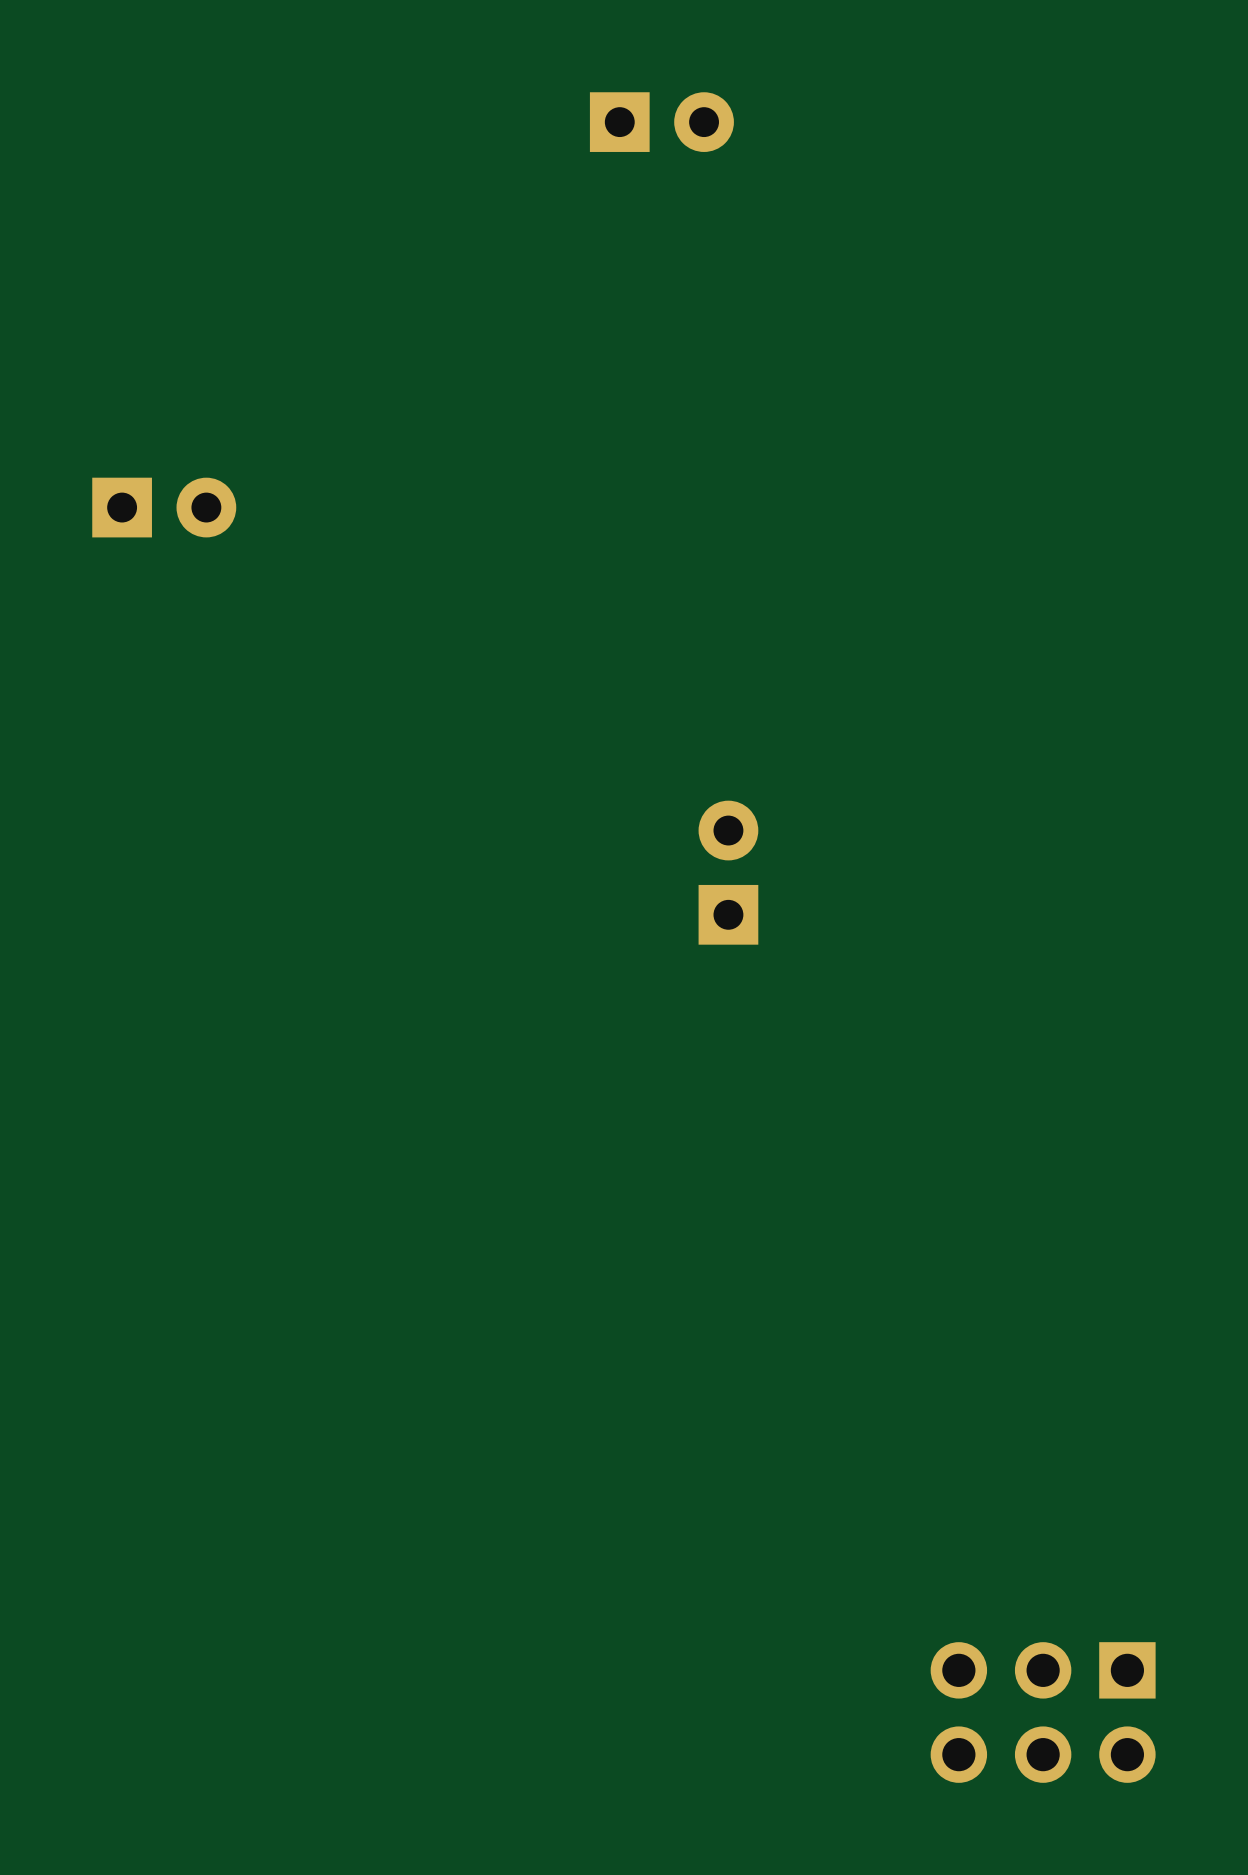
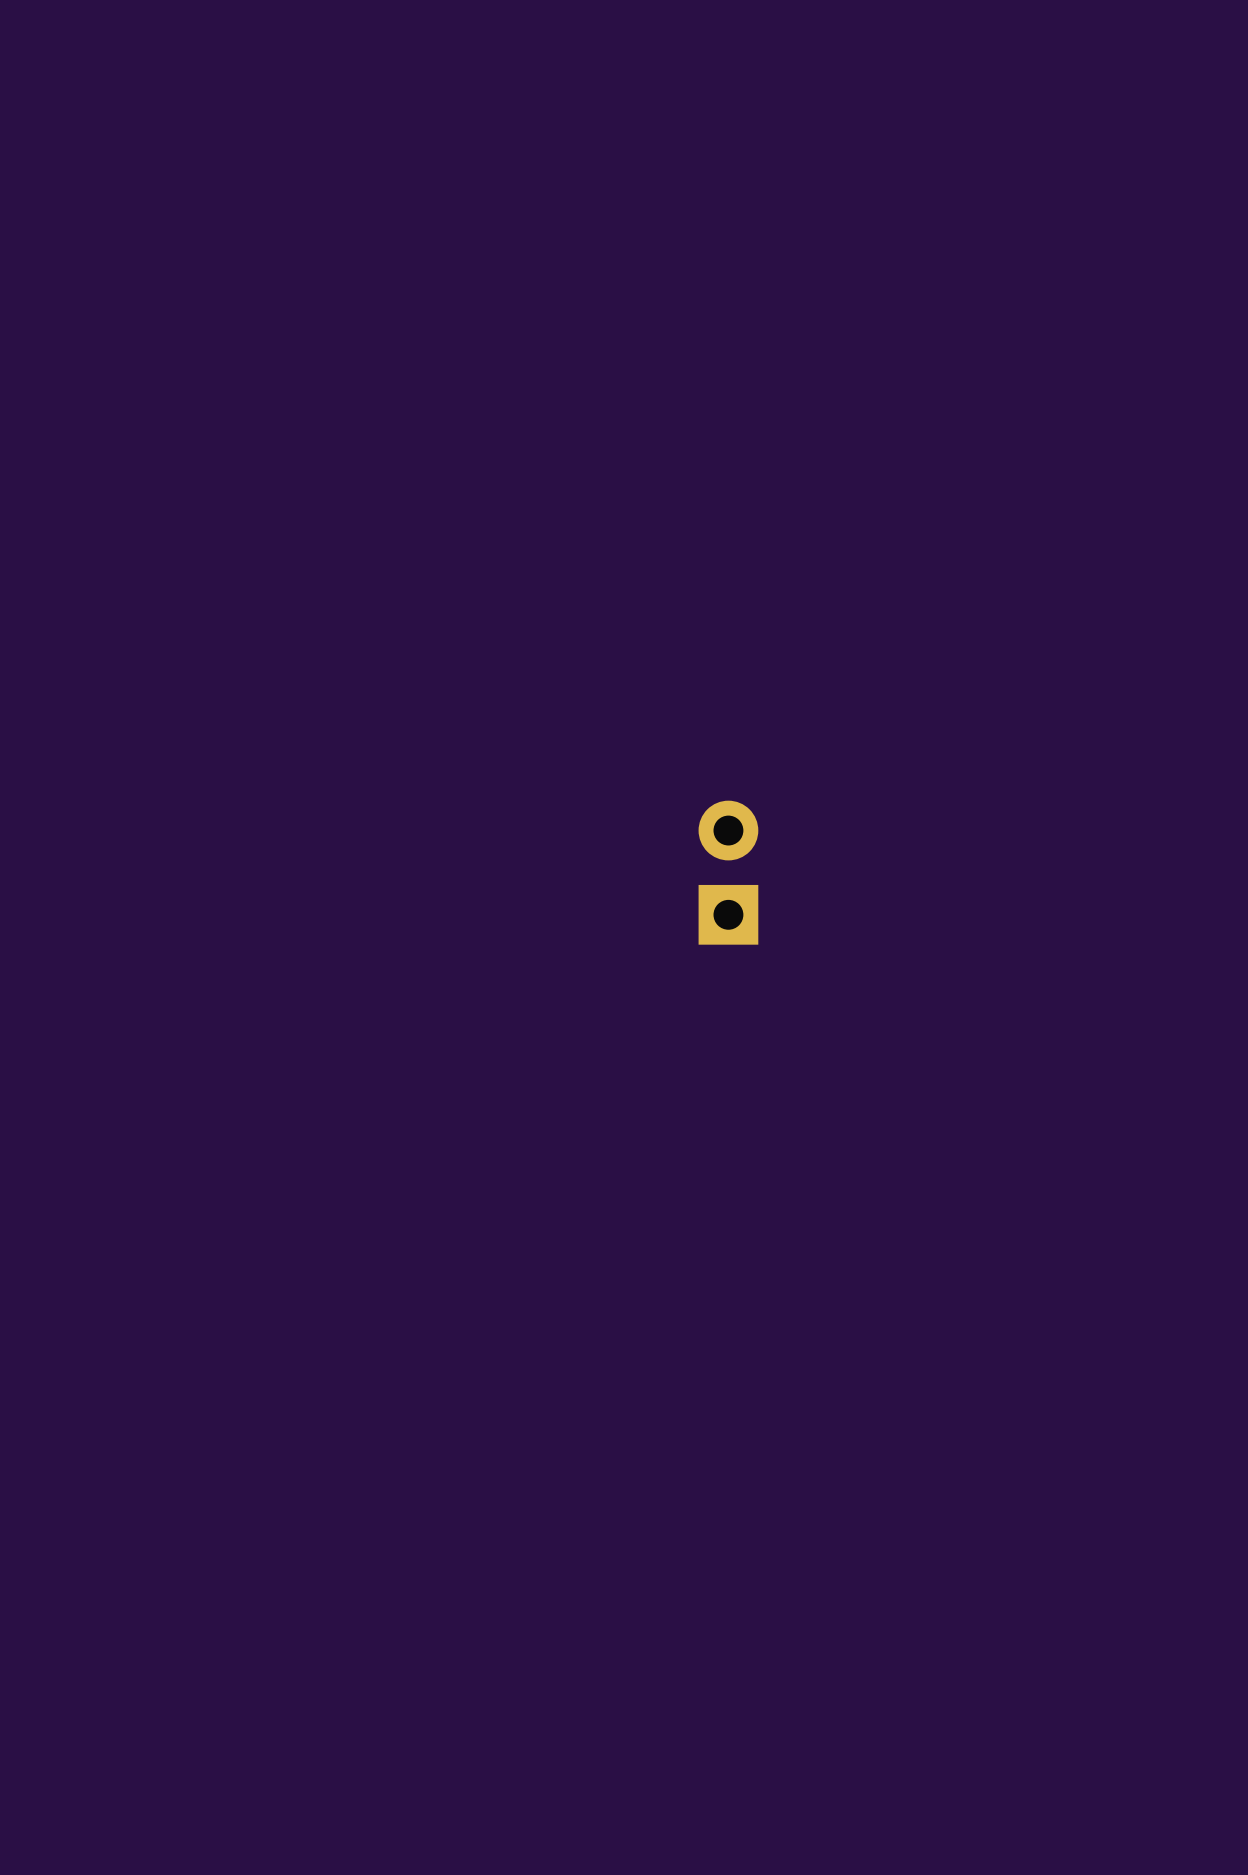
part: (661, 122) -> none
part: (164, 507) -> none
part: (1043, 1712) -> none

